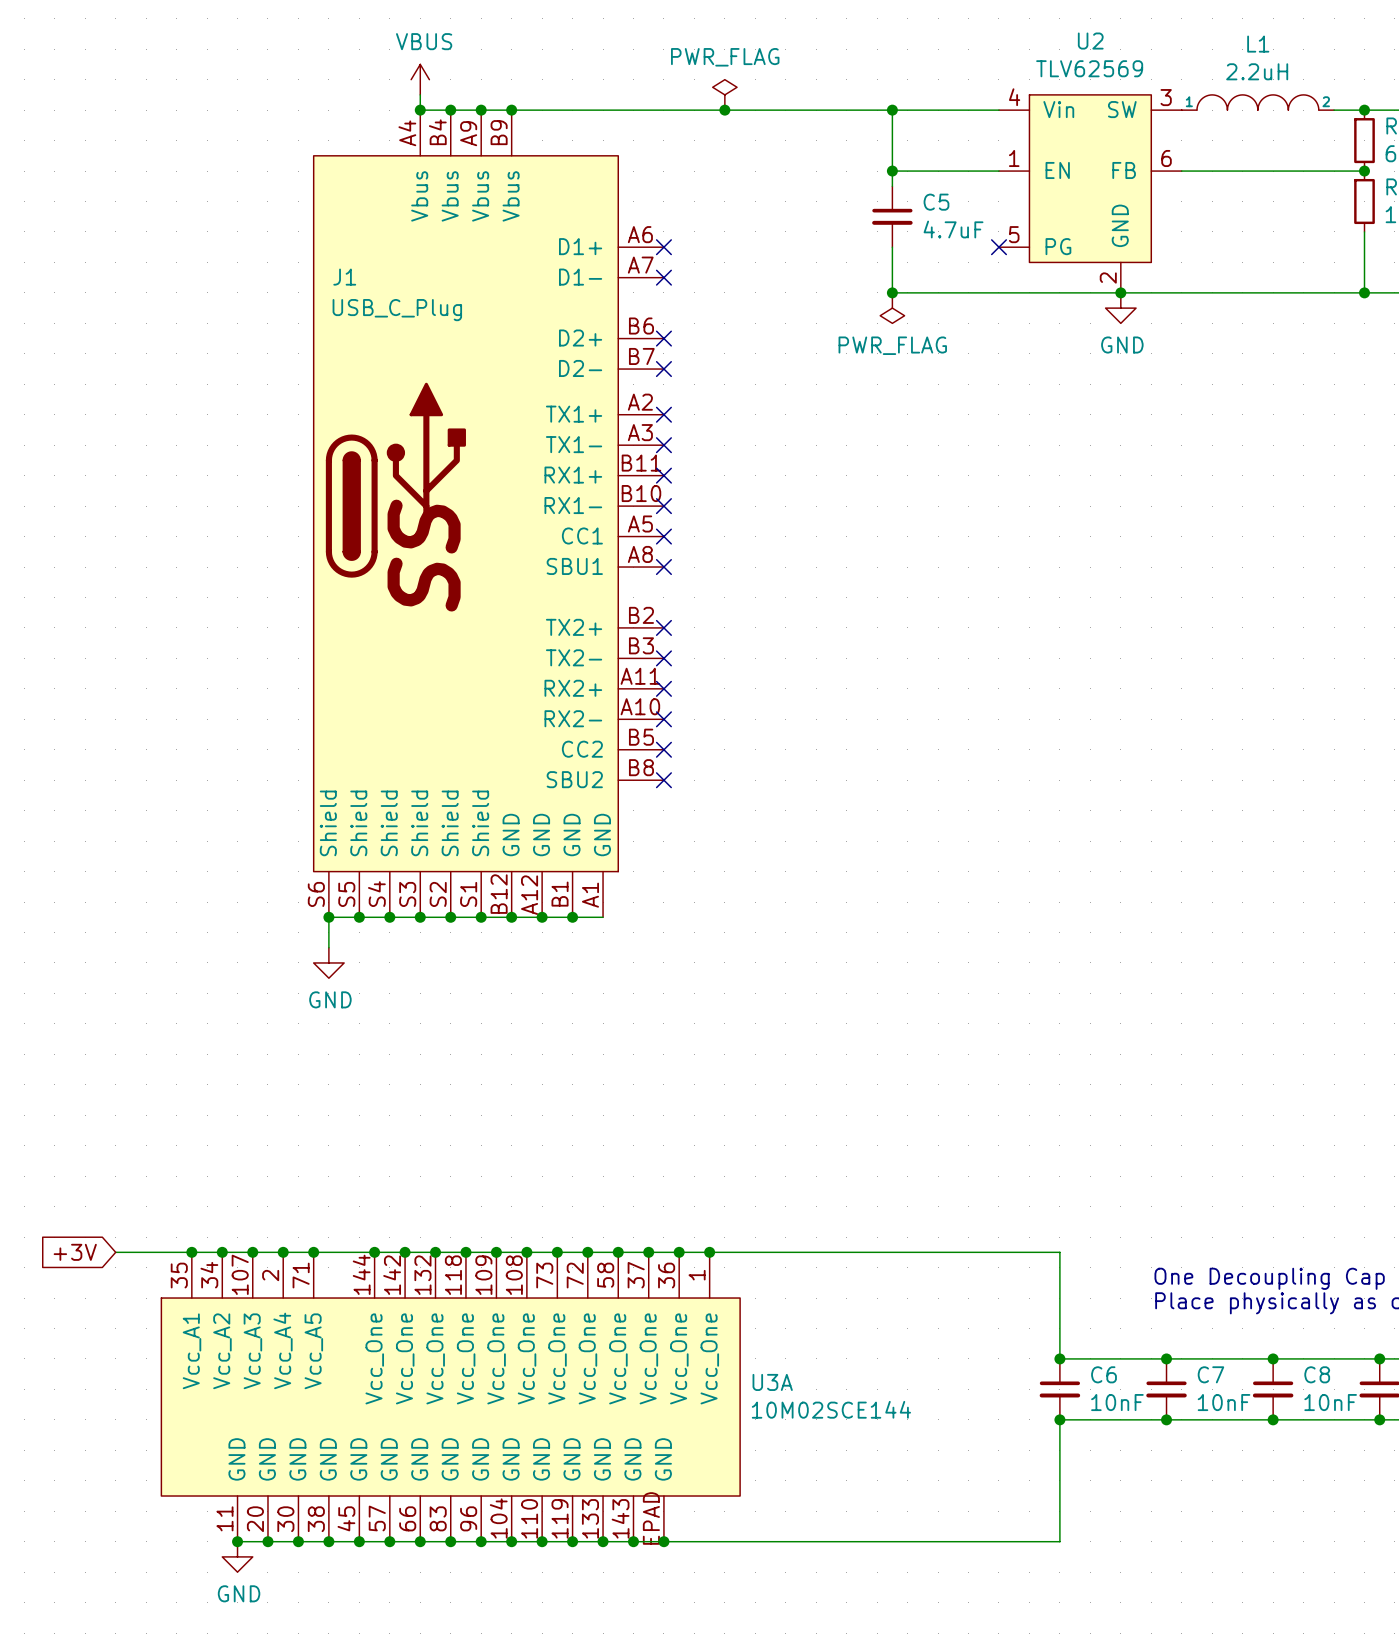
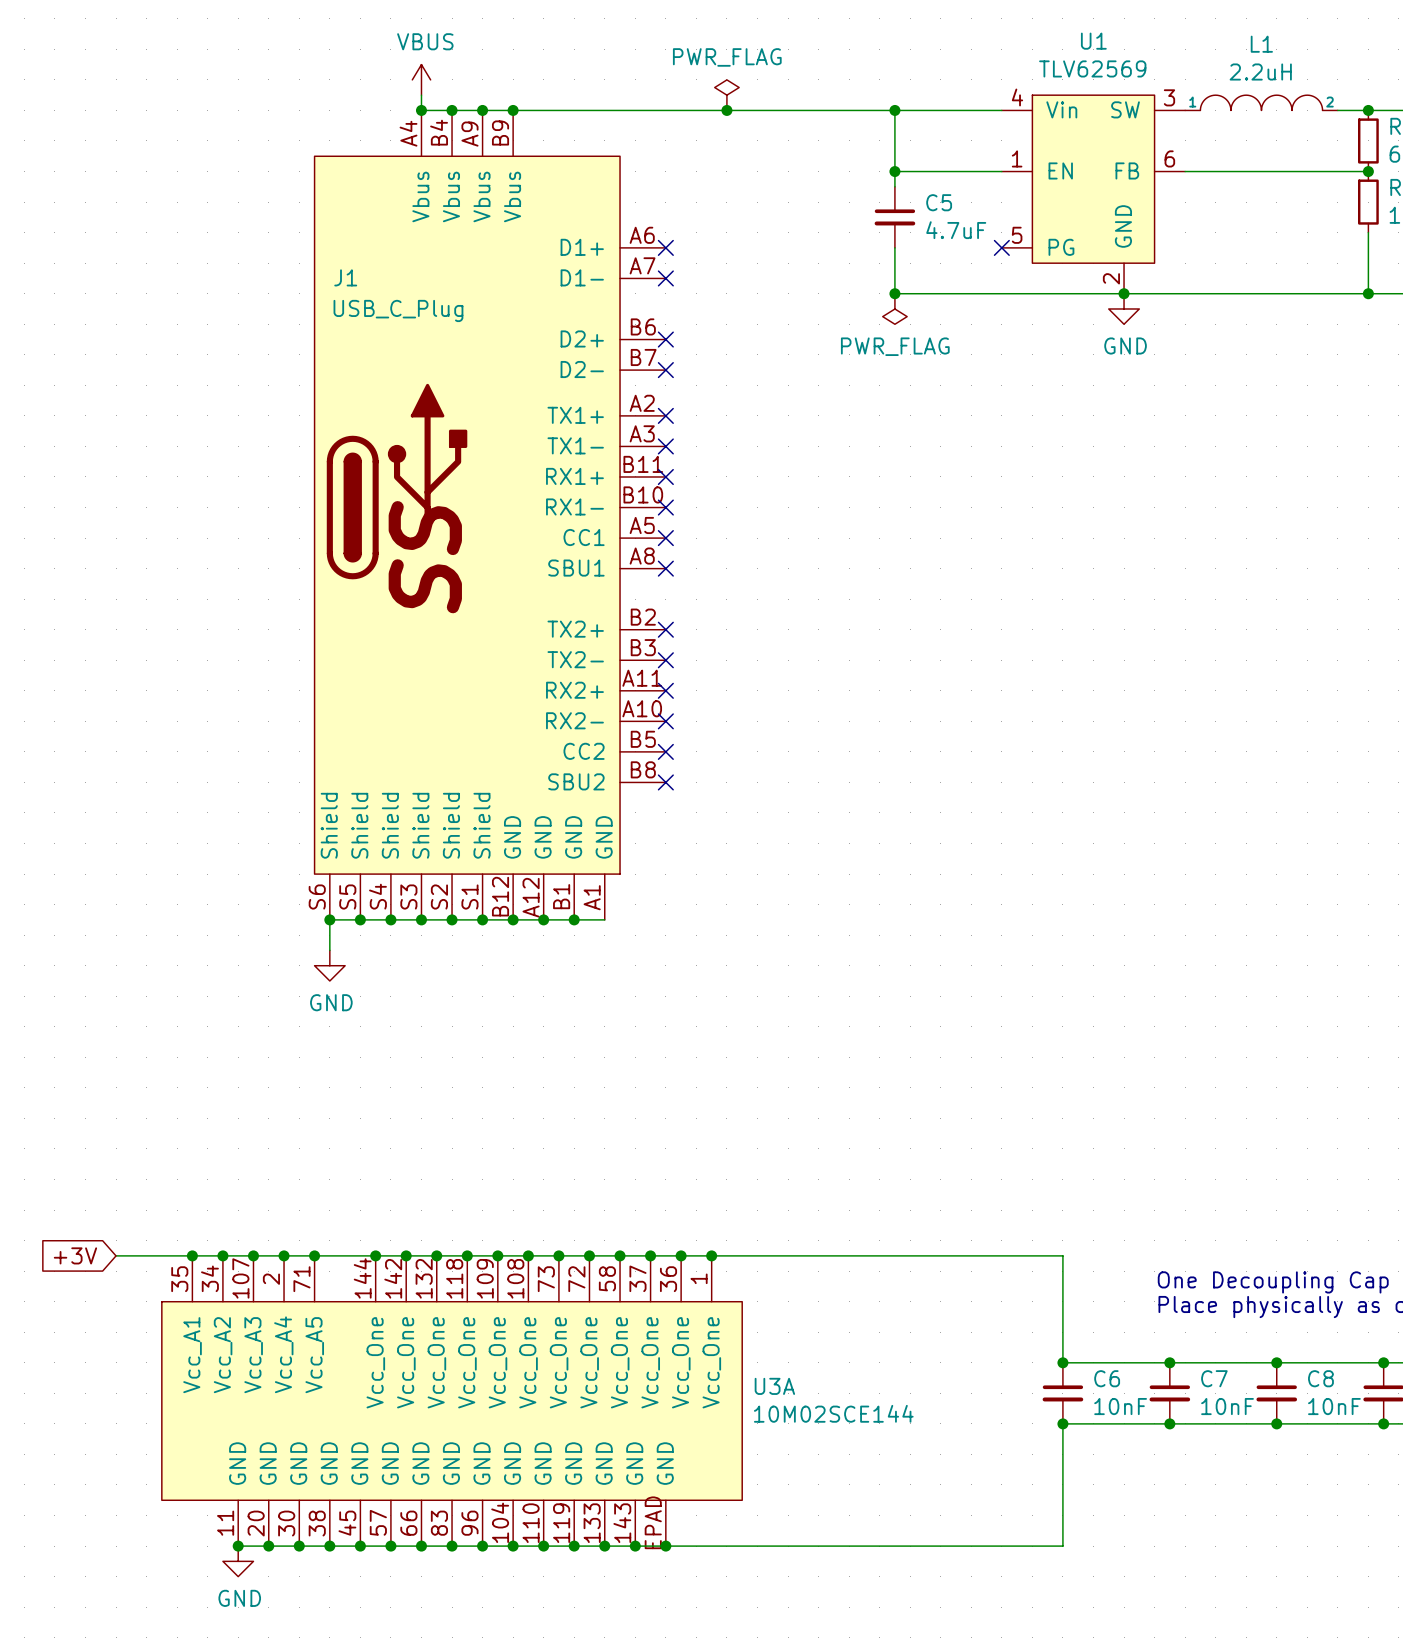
U2 name: U2 (1090, 41) -> U1 (1093, 41)

